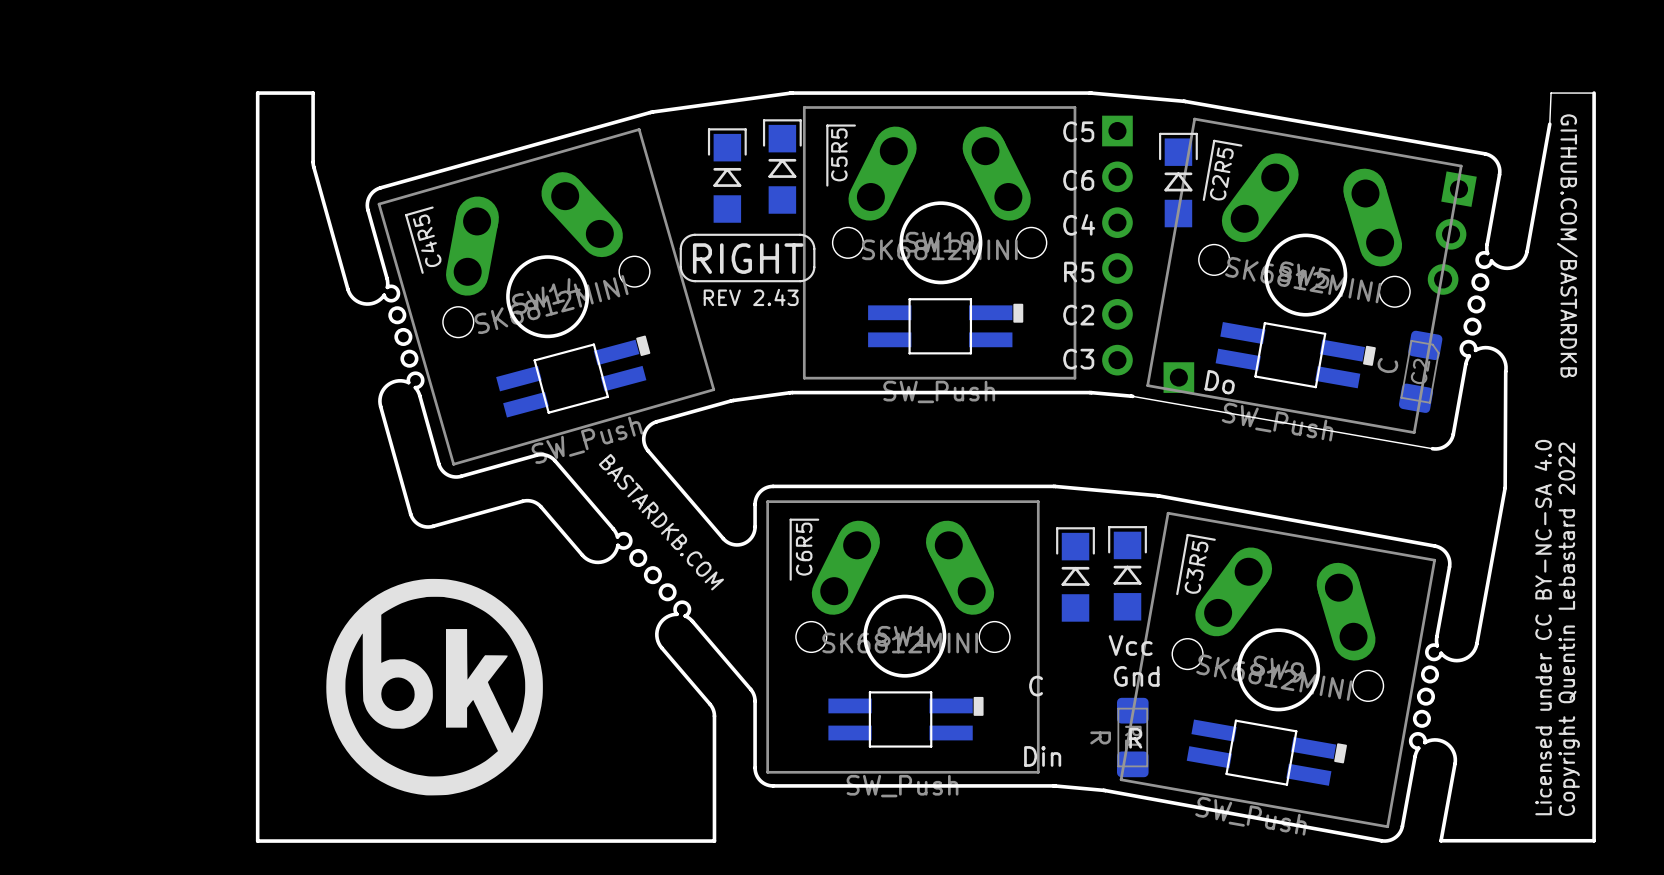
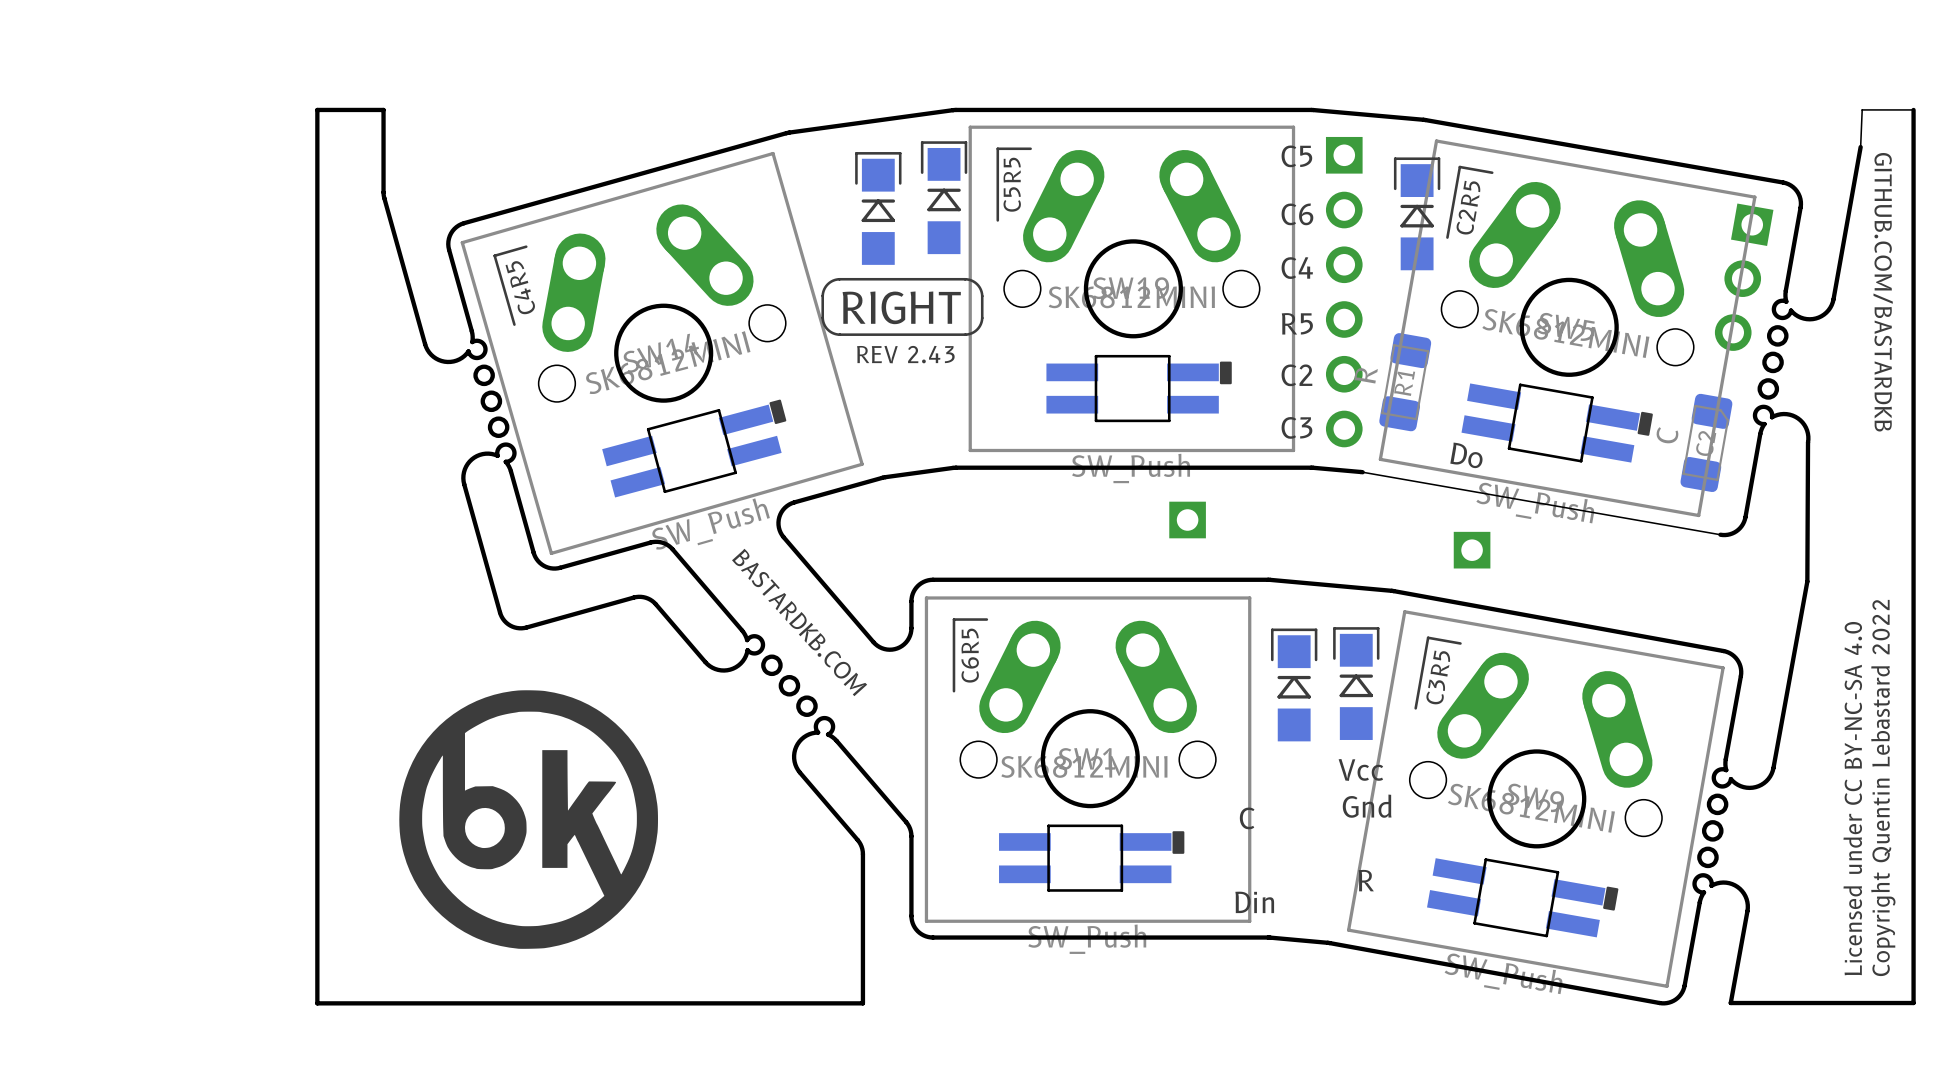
part position: (1178, 377) -> (1472, 550)
part: none -> (1187, 520)
R1 rotation: 0° (1132, 737) -> 10° clockwise (1405, 382)
R1 position: (1132, 737) -> (1405, 382)

